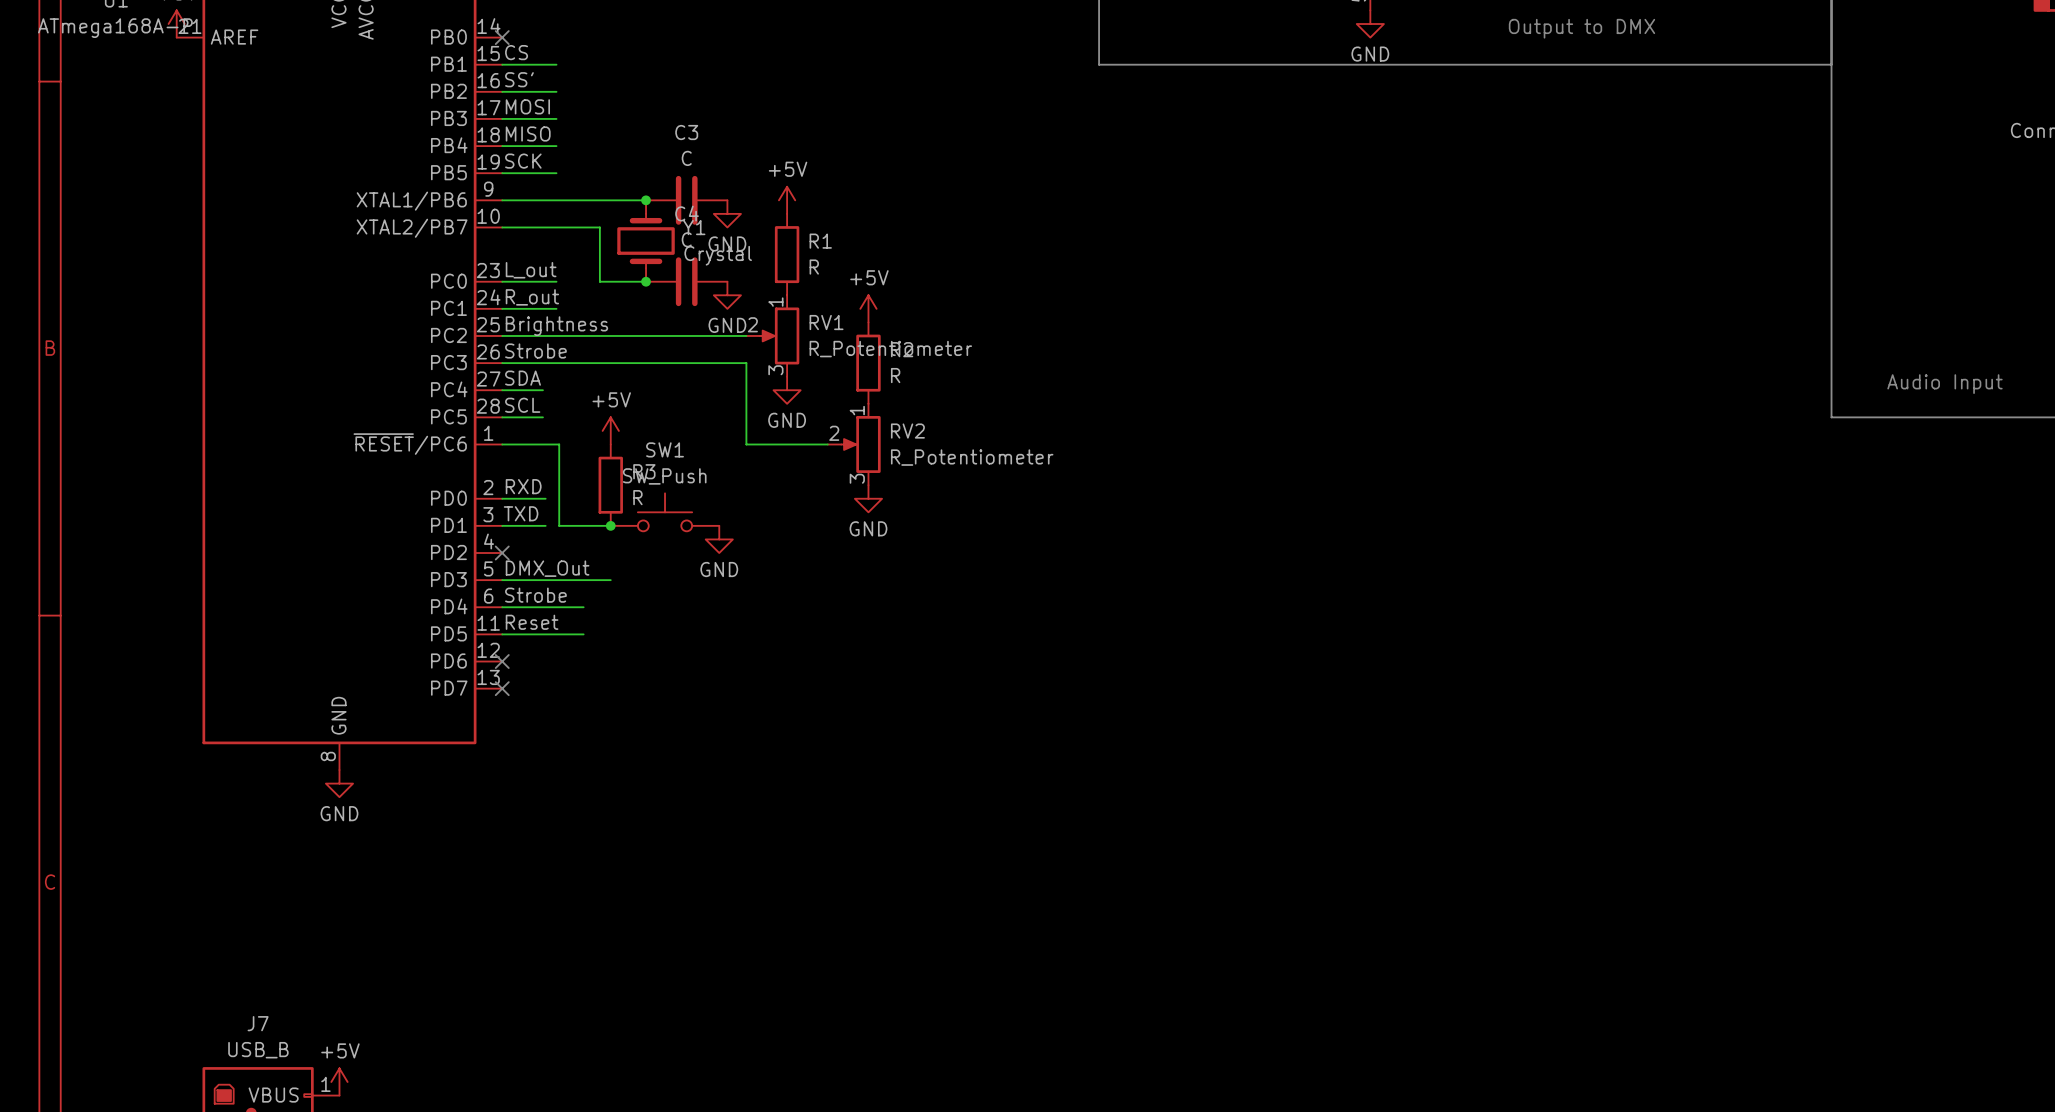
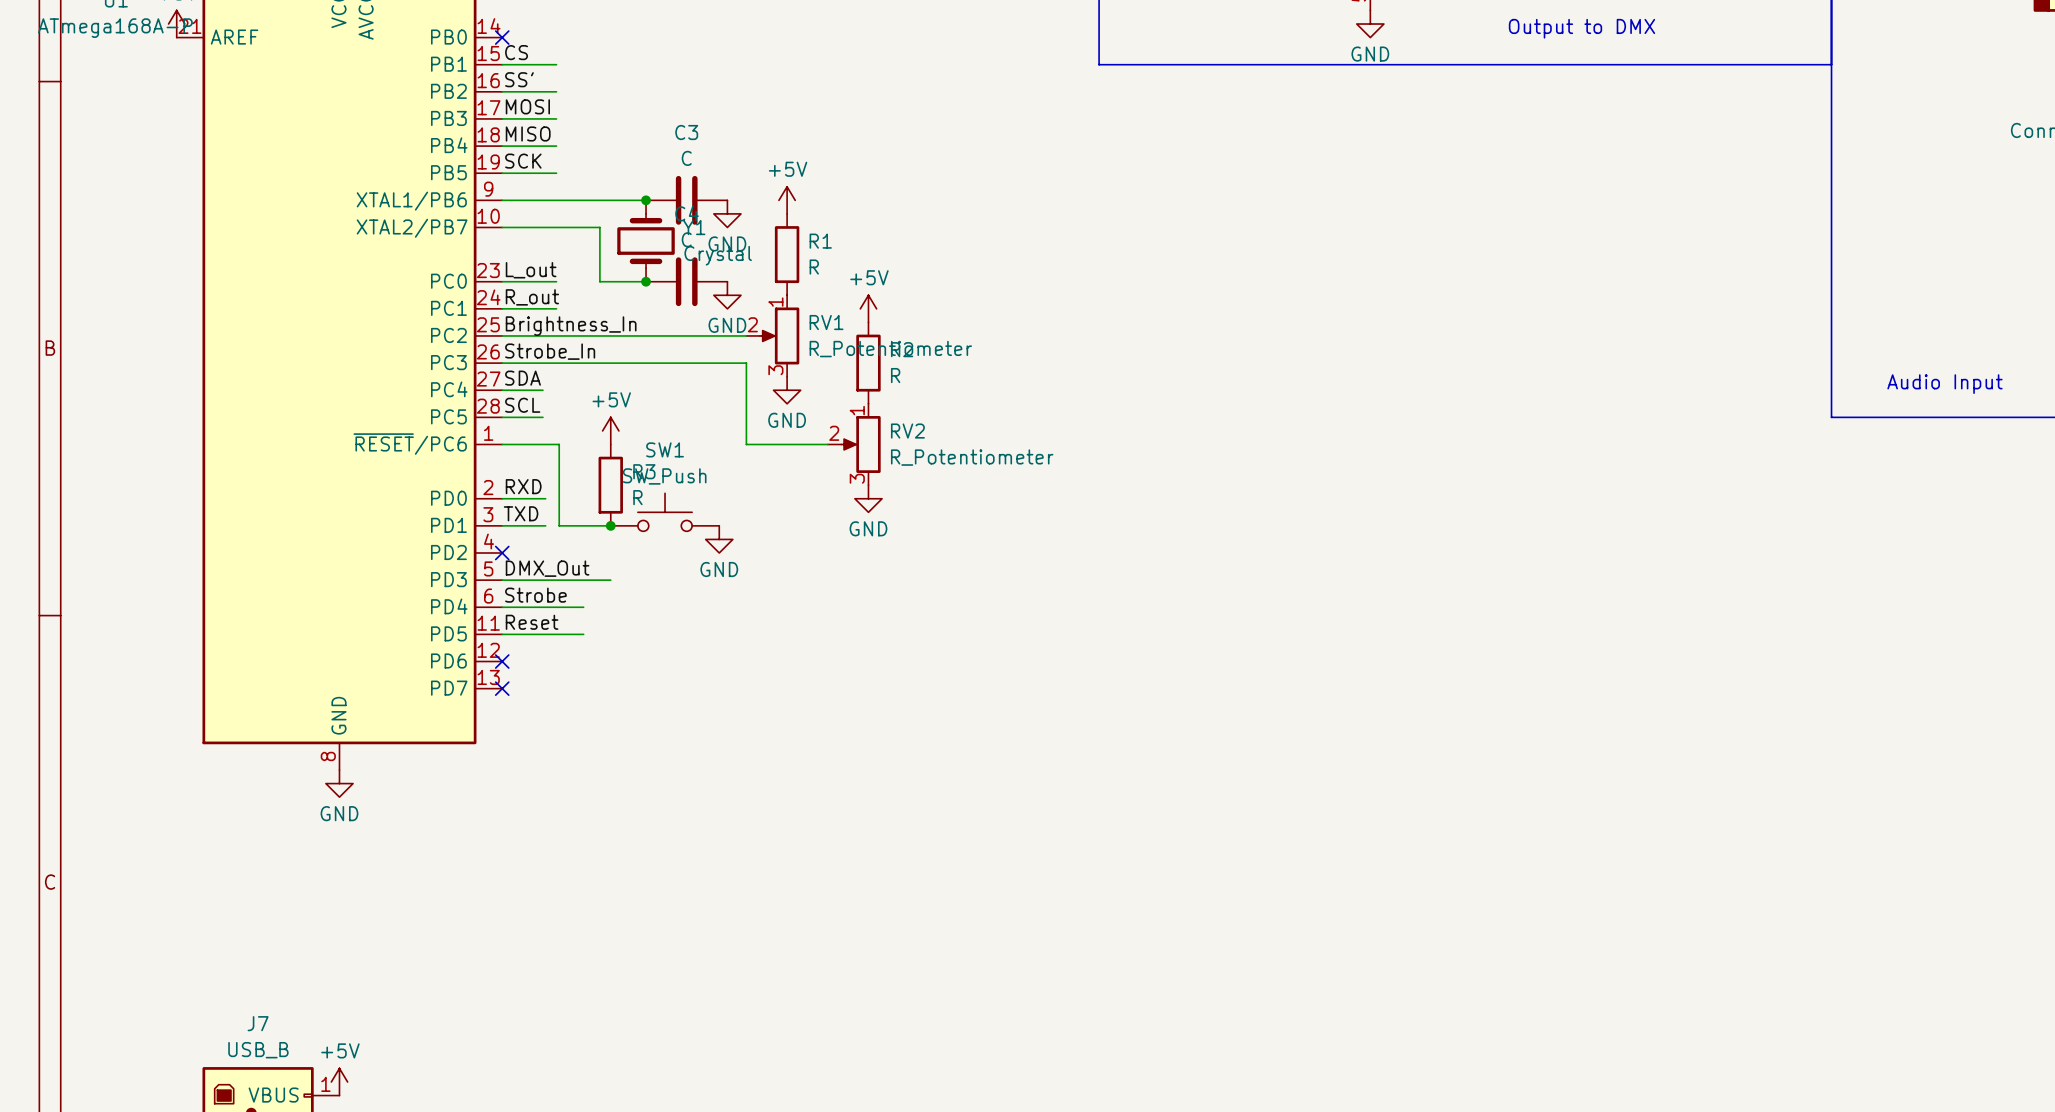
label: Brightness (556, 326) -> Brightness_In (571, 326)
label: Strobe (535, 351) -> Strobe_In (550, 351)

